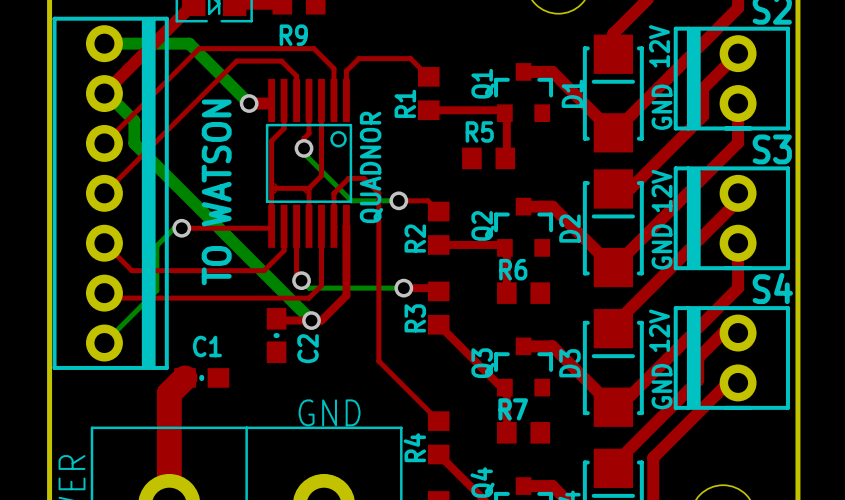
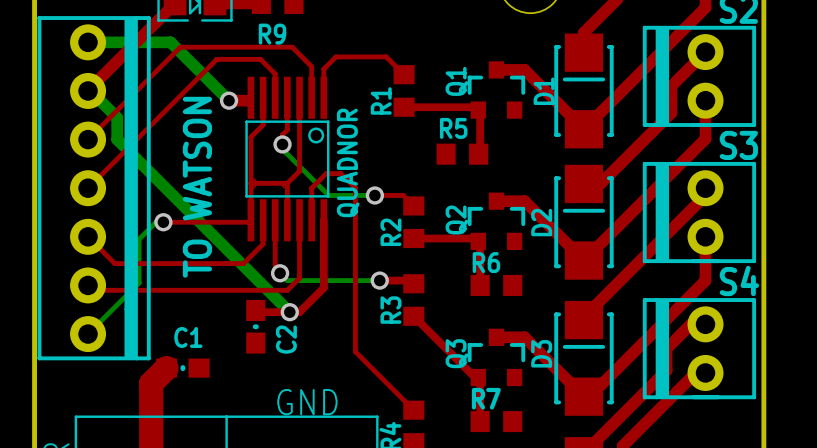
text: 12V (659, 46) -> none
text: GND (662, 107) -> none
text: 12V (662, 191) -> none
text: GND (662, 246) -> none
text: 12V (659, 330) -> none
text: GND (662, 386) -> none

